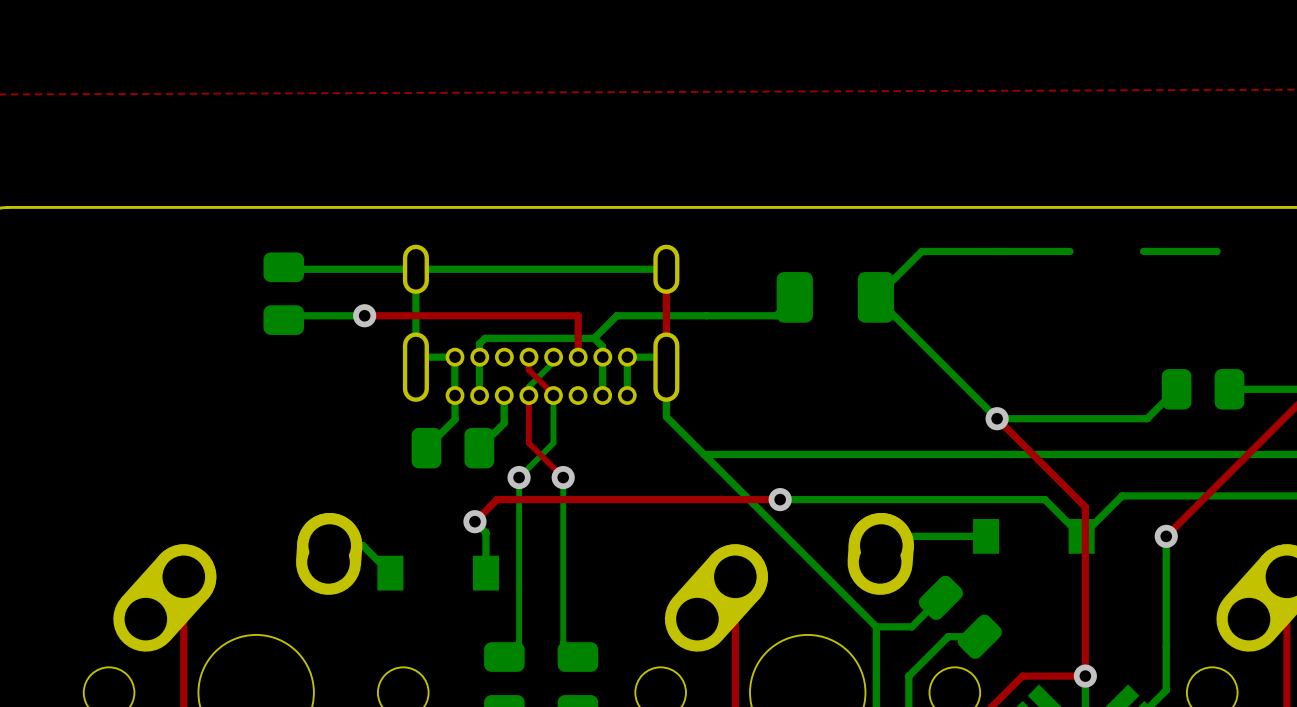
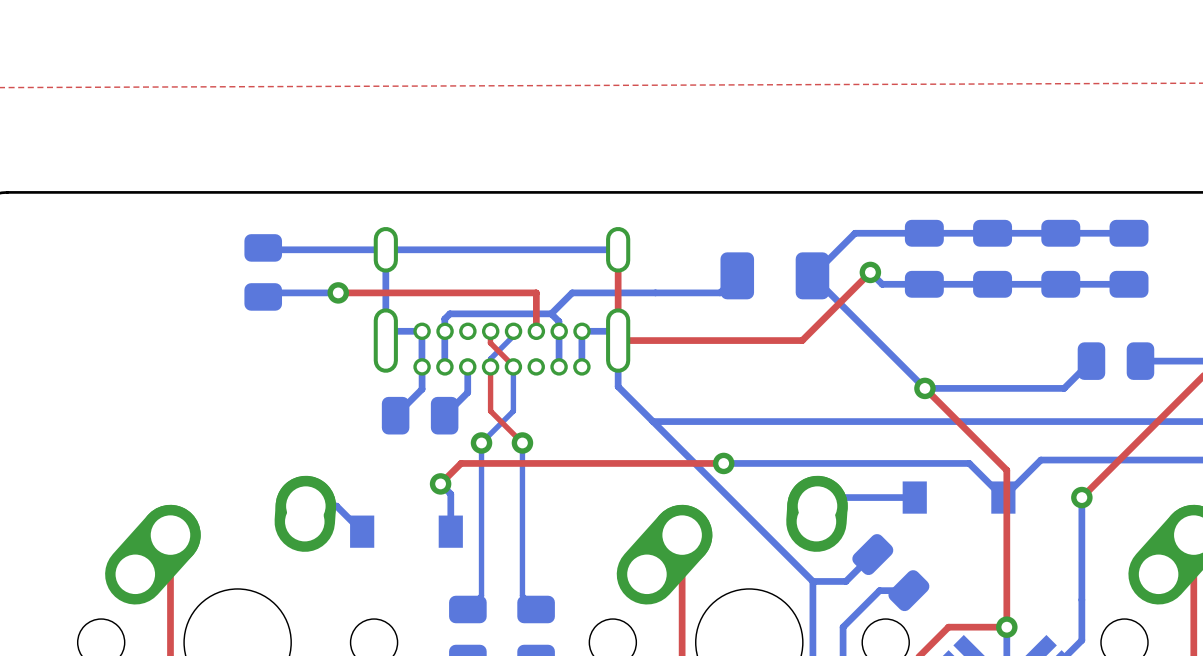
bottom track: none -> (992, 233) (1060, 233)
part: none -> (924, 258)
part: none -> (992, 258)
part: none -> (1060, 258)
part: none -> (1129, 258)
top track: none -> (870, 272) (802, 340) (618, 340)
bottom track: none -> (870, 272) (882, 284) (1137, 284)
via: none -> (870, 272)

